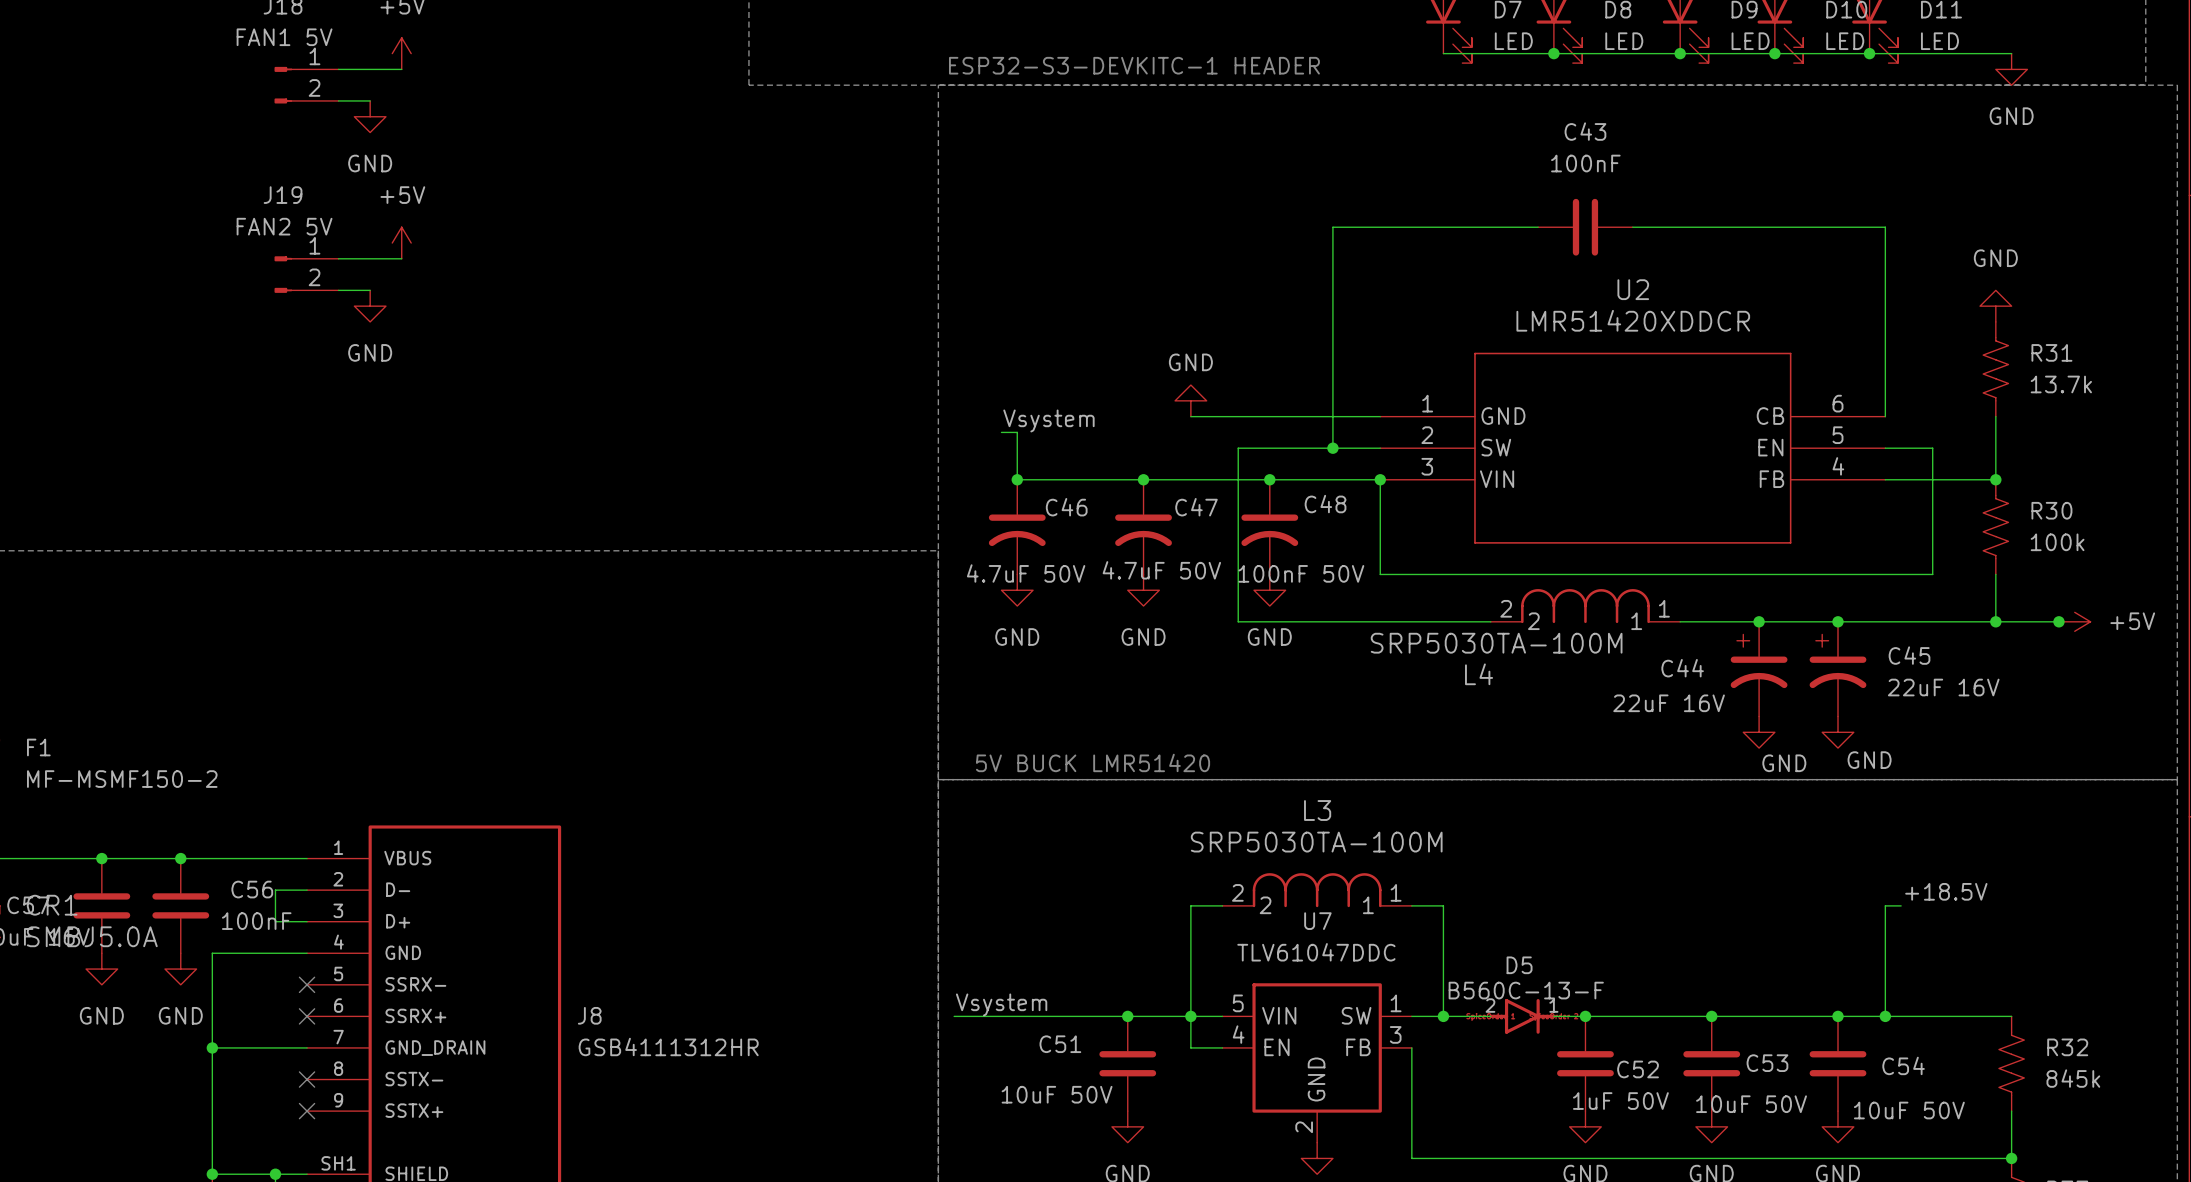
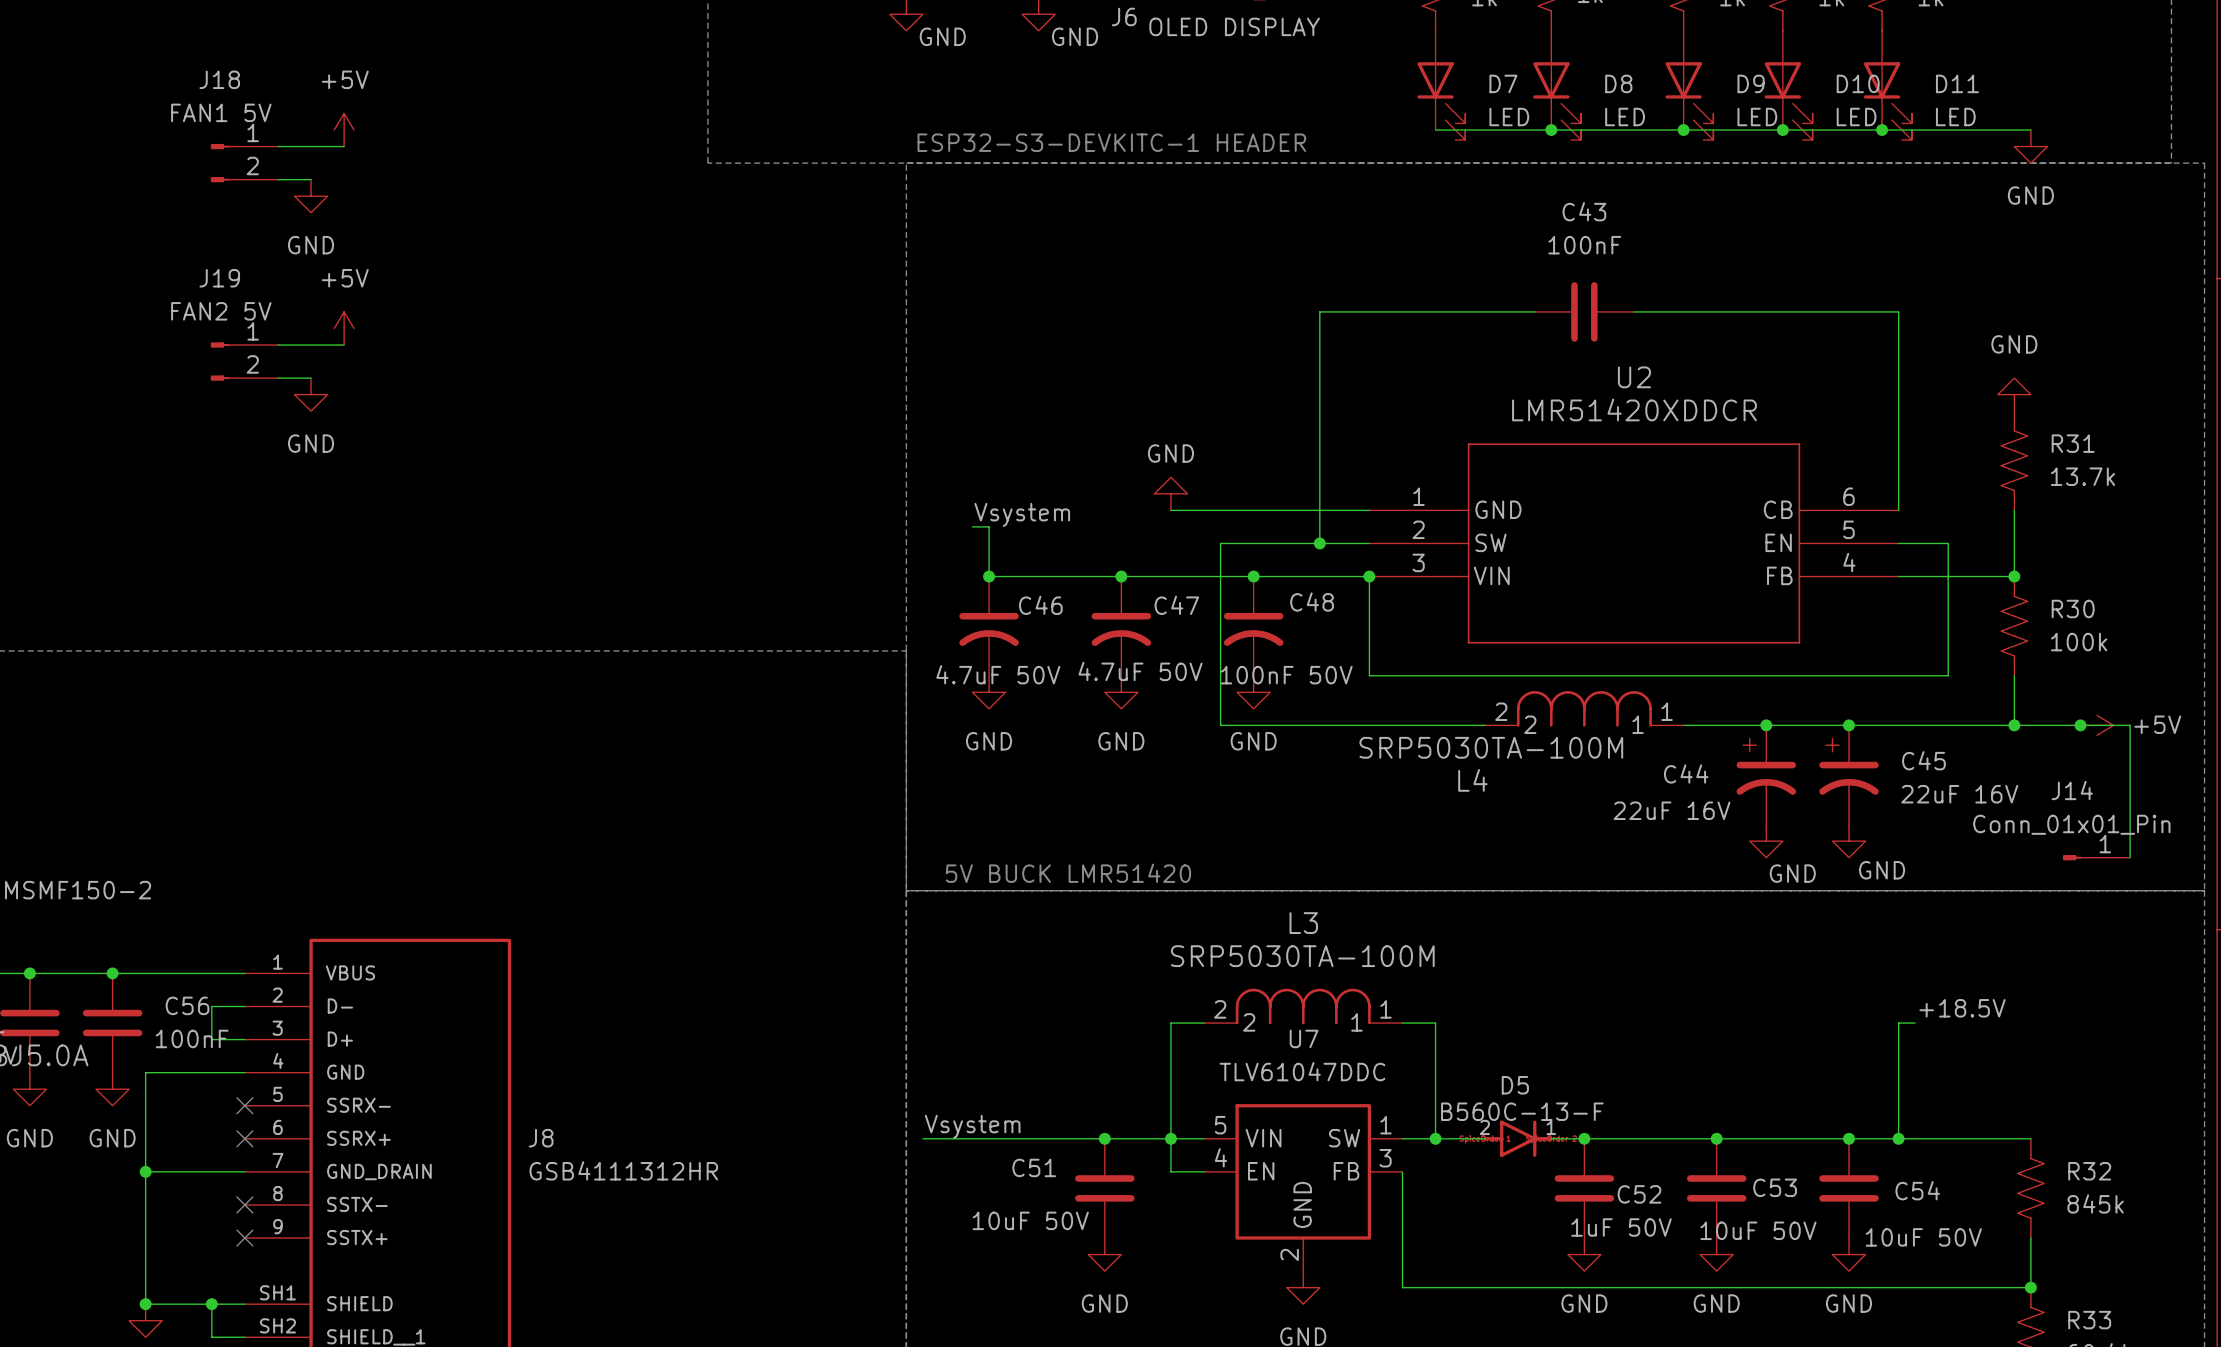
wire: none -> (2080, 725) (2130, 725) (2130, 857)
J14: none -> Conn_01x01_Pin (2096, 857)

